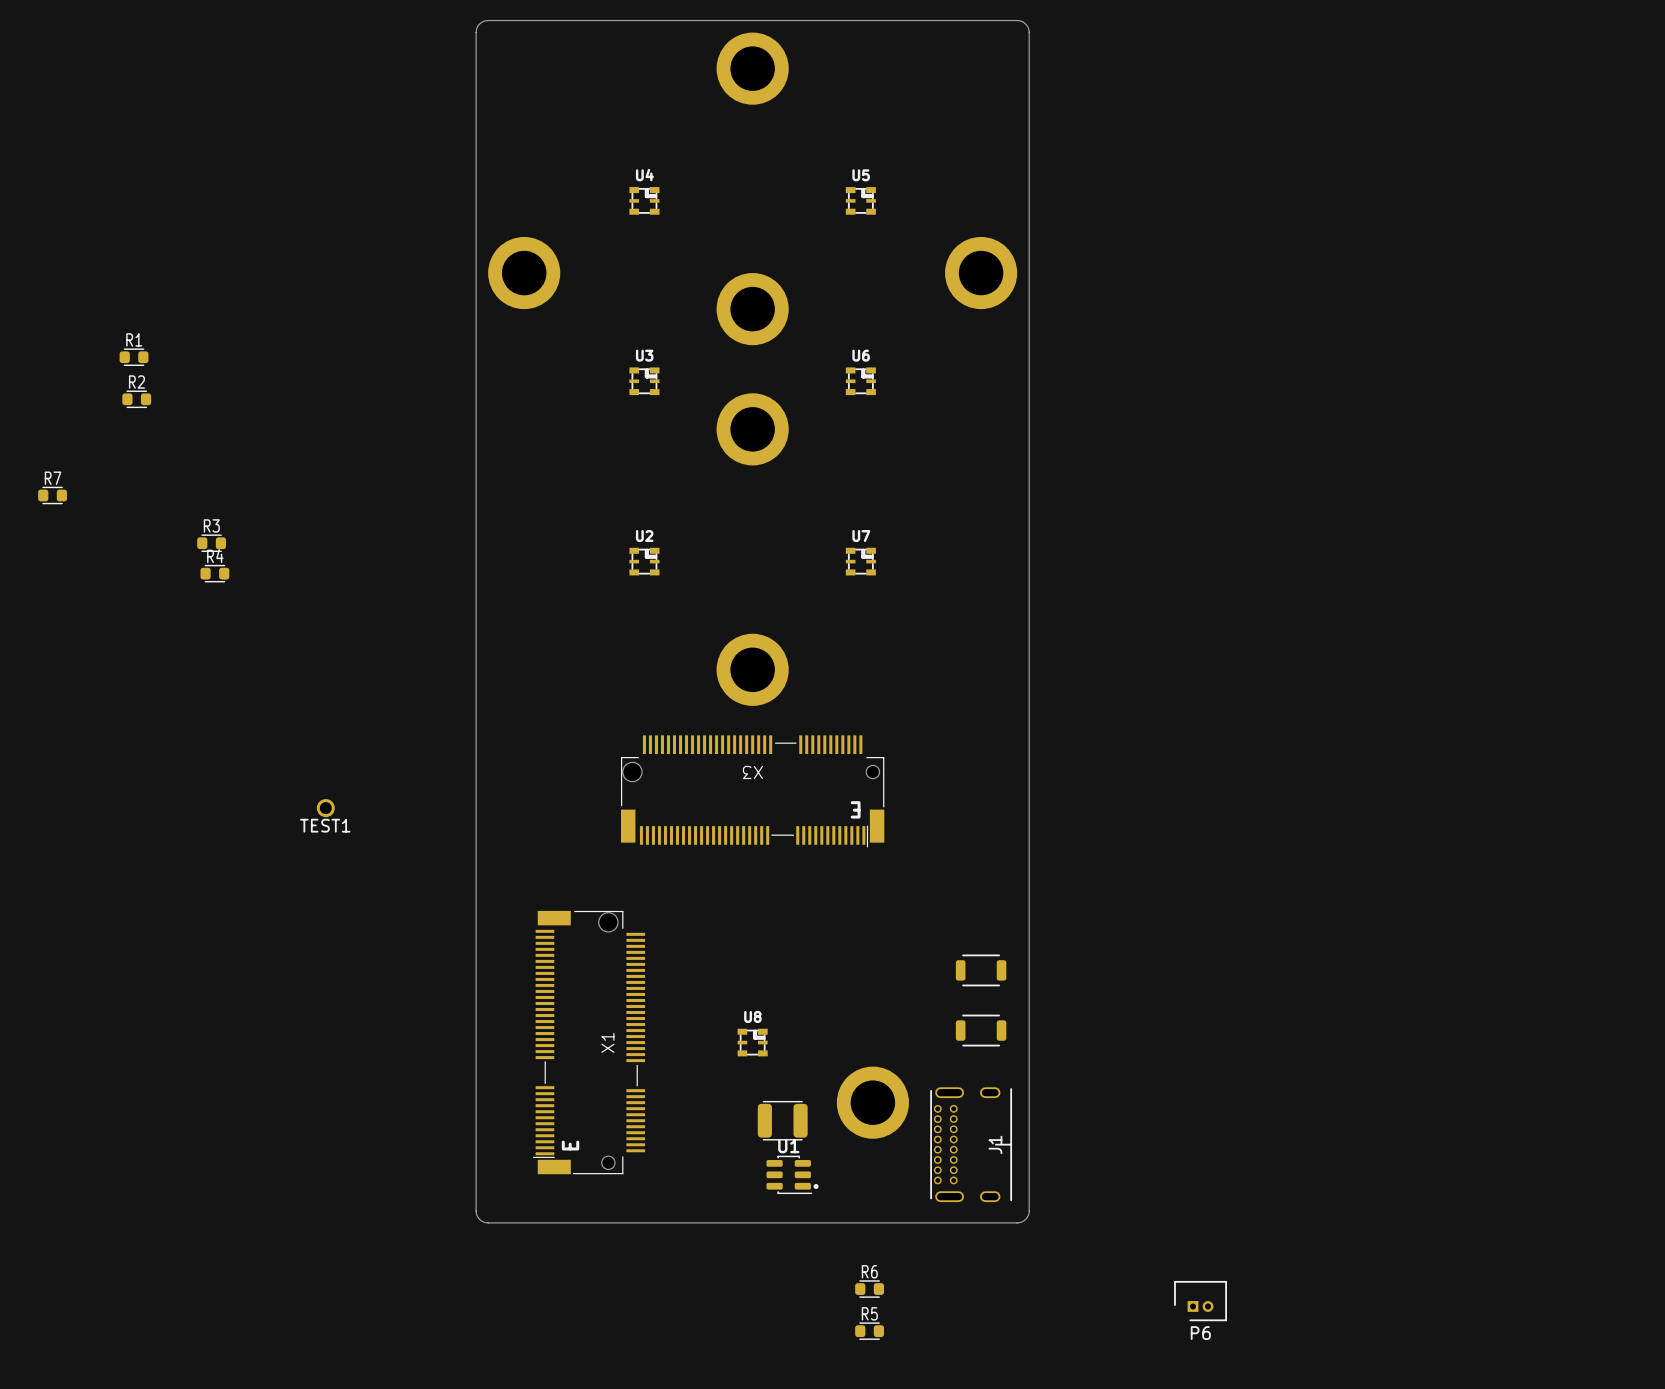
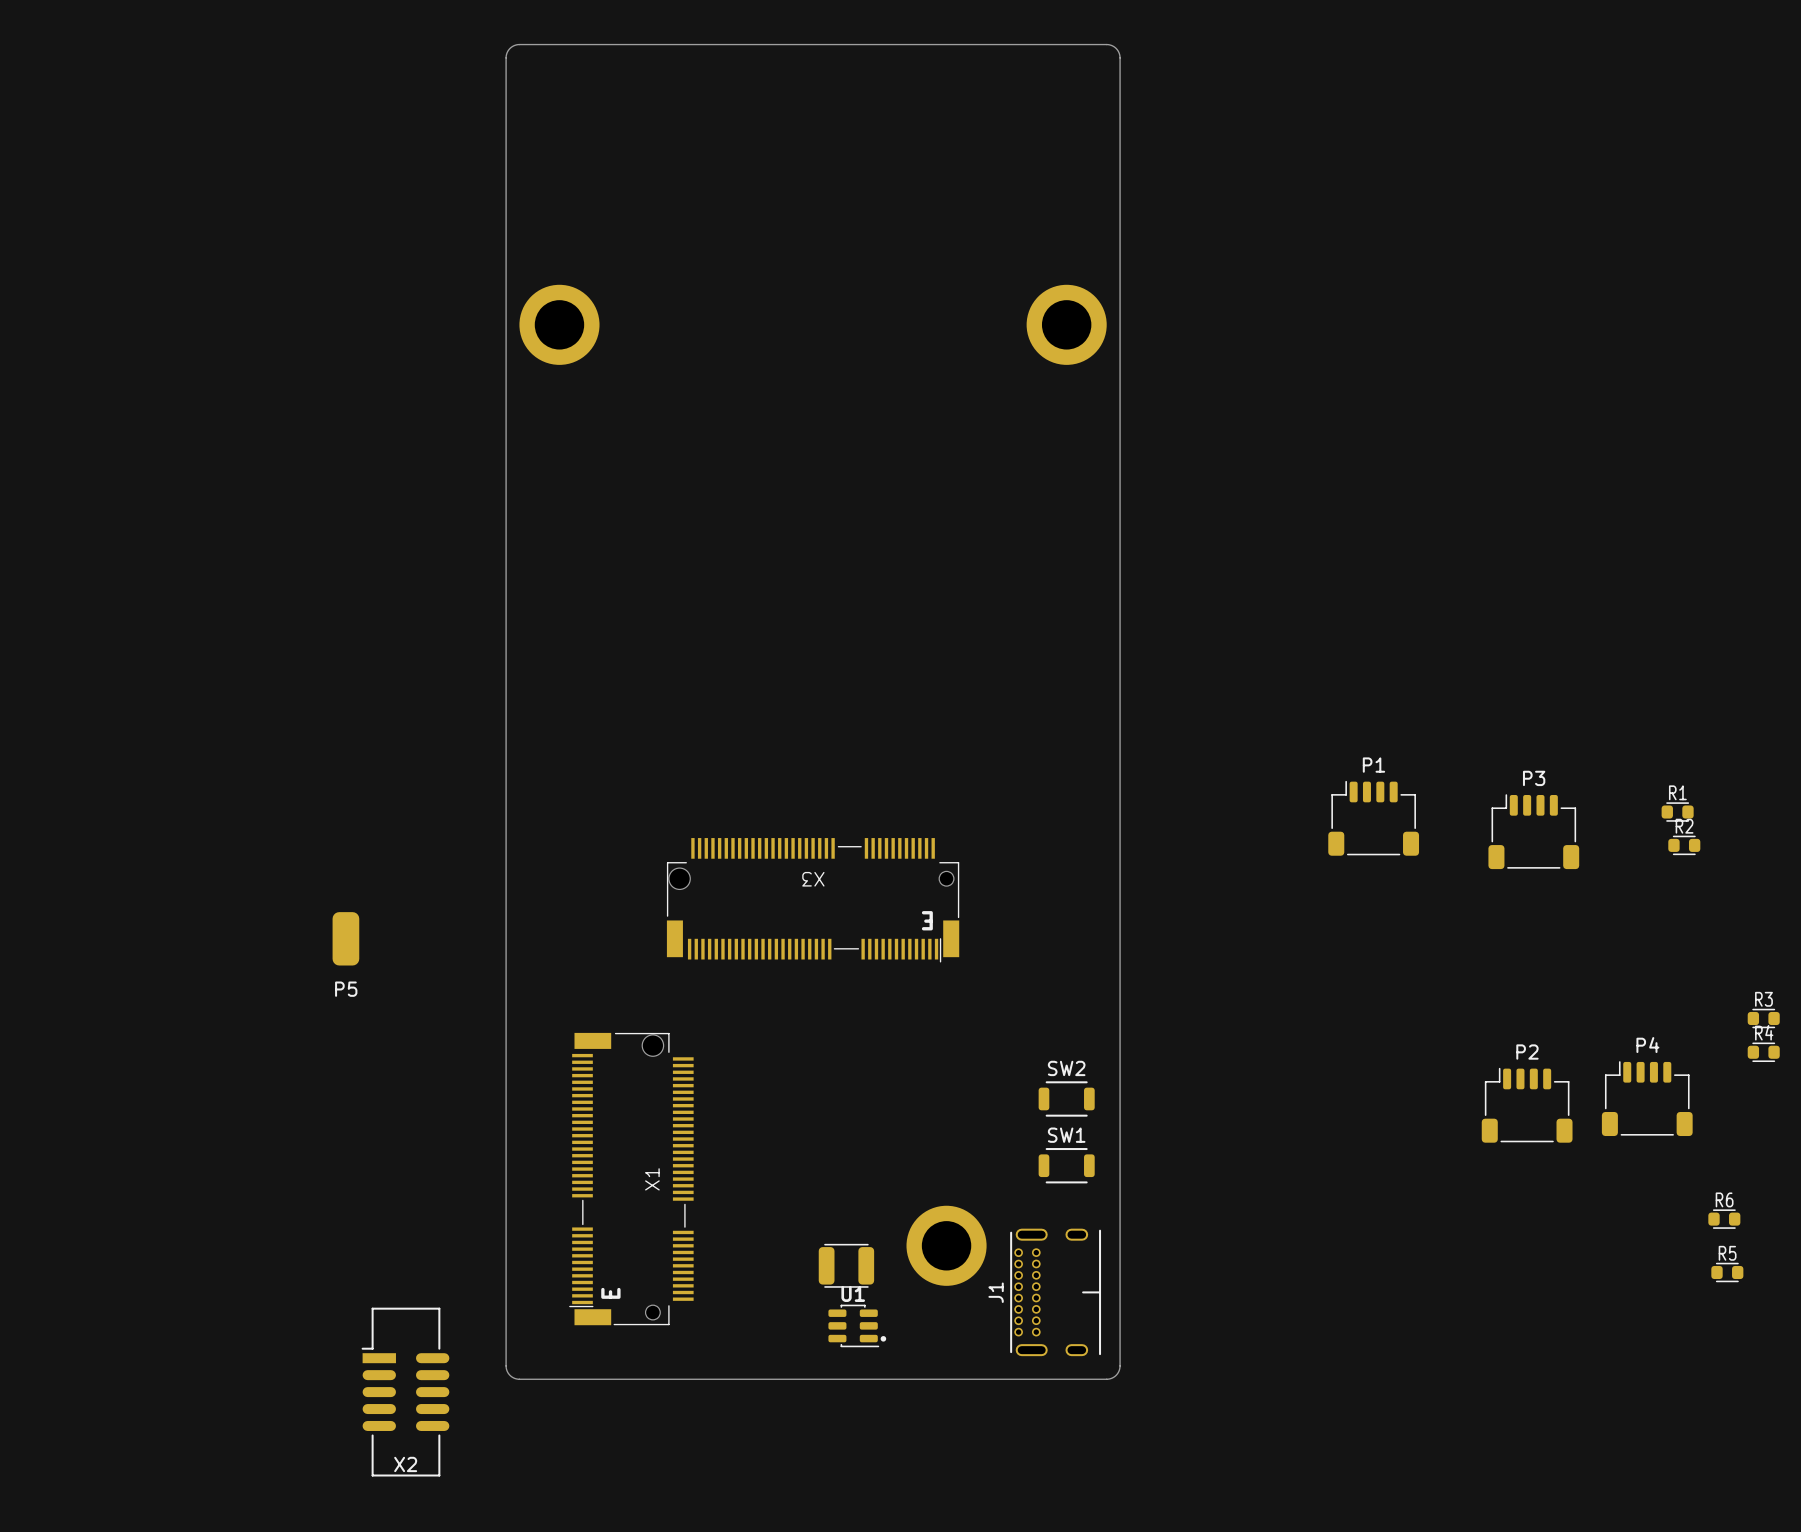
part: (752, 68) -> none
U4: (644, 200) -> none
U5: (860, 200) -> none
part: (752, 309) -> none
R1 position: (134, 357) -> (1677, 812)
U3: (644, 381) -> none
U6: (860, 381) -> none
R2 position: (136, 399) -> (1684, 845)
part: (752, 429) -> none
R7: (52, 495) -> none
R3 position: (211, 543) -> (1763, 1018)
U2: (644, 561) -> none
U7: (860, 561) -> none
R4 position: (214, 573) -> (1763, 1052)
part: (752, 669) -> none
P1: none -> (1373, 818)
P3: none -> (1533, 831)
TEST1: (325, 808) -> none
P5: none -> (345, 938)
SW2 name: none -> SW2 (1066, 1068)
P4: none -> (1647, 1098)
P2: none -> (1527, 1105)
SW1 name: none -> SW1 (1066, 1135)
U8: (752, 1042) -> none
J1 name position: J1 (995, 1144) -> J1 (996, 1292)
X2: none -> (405, 1392)
R6 position: (869, 1289) -> (1724, 1219)
P6: (1200, 1301) -> none
R5 position: (869, 1331) -> (1727, 1272)

